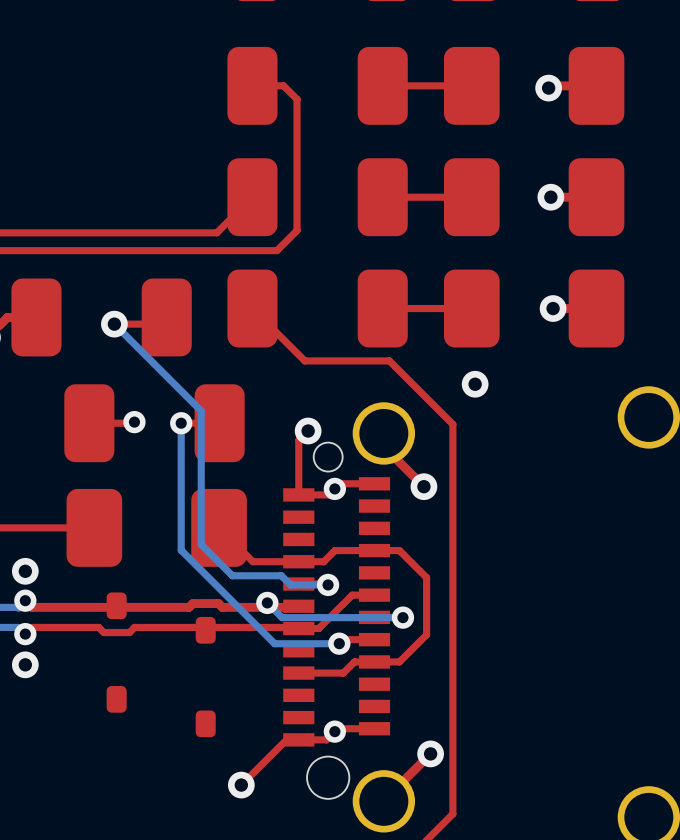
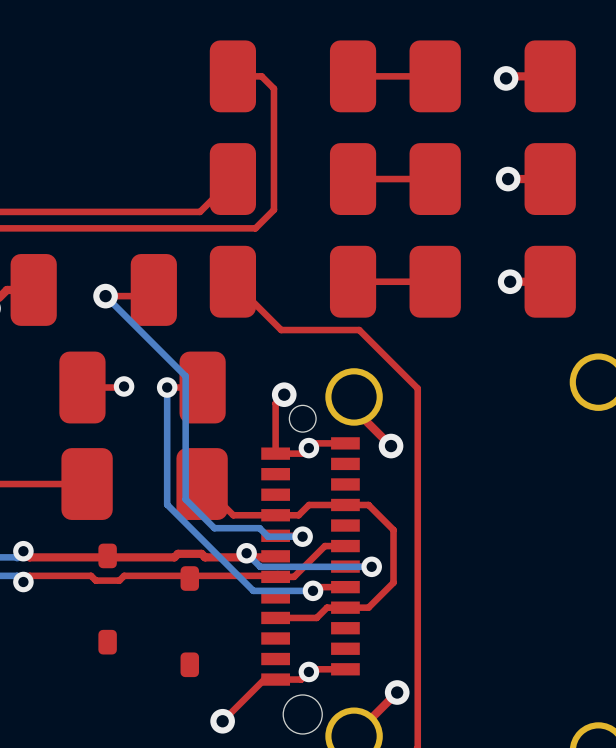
via: (475, 384) -> none
via: (25, 571) -> none
via: (25, 664) -> none

